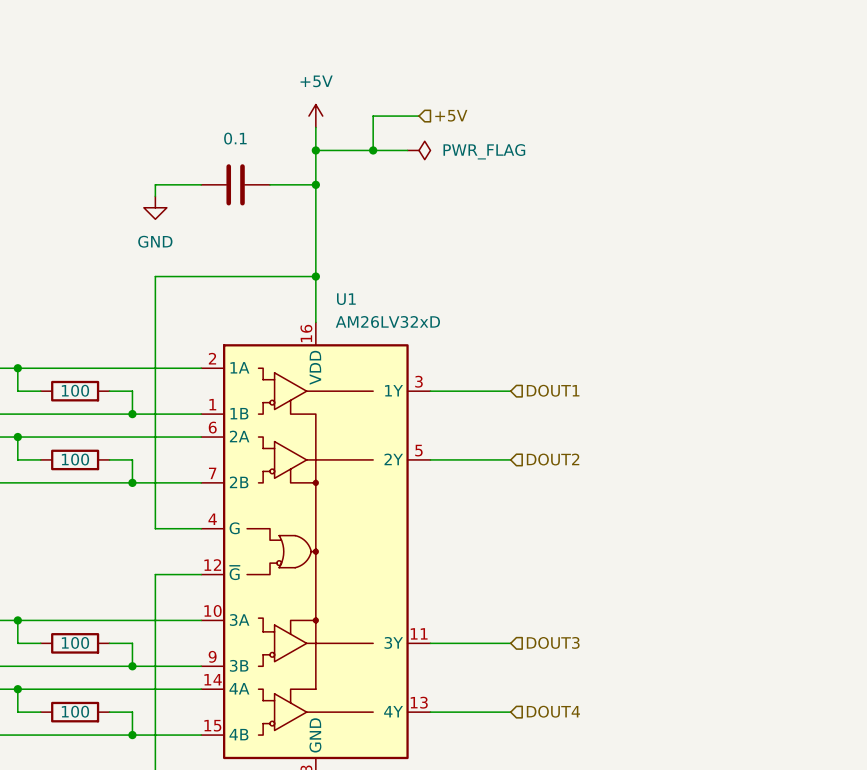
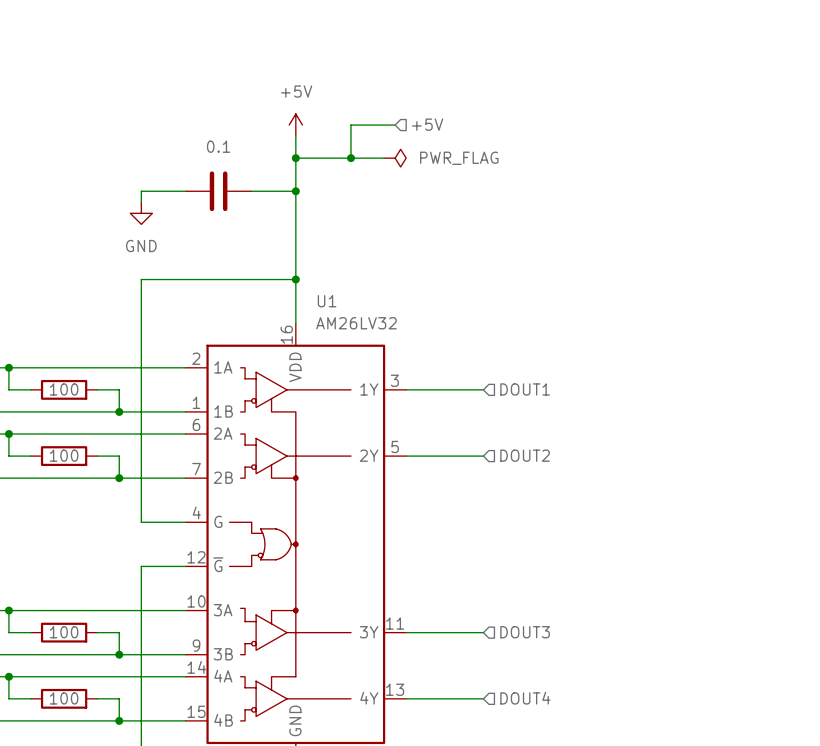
U1 value: AM26LV32xD (387, 321) -> AM26LV32 (356, 323)

